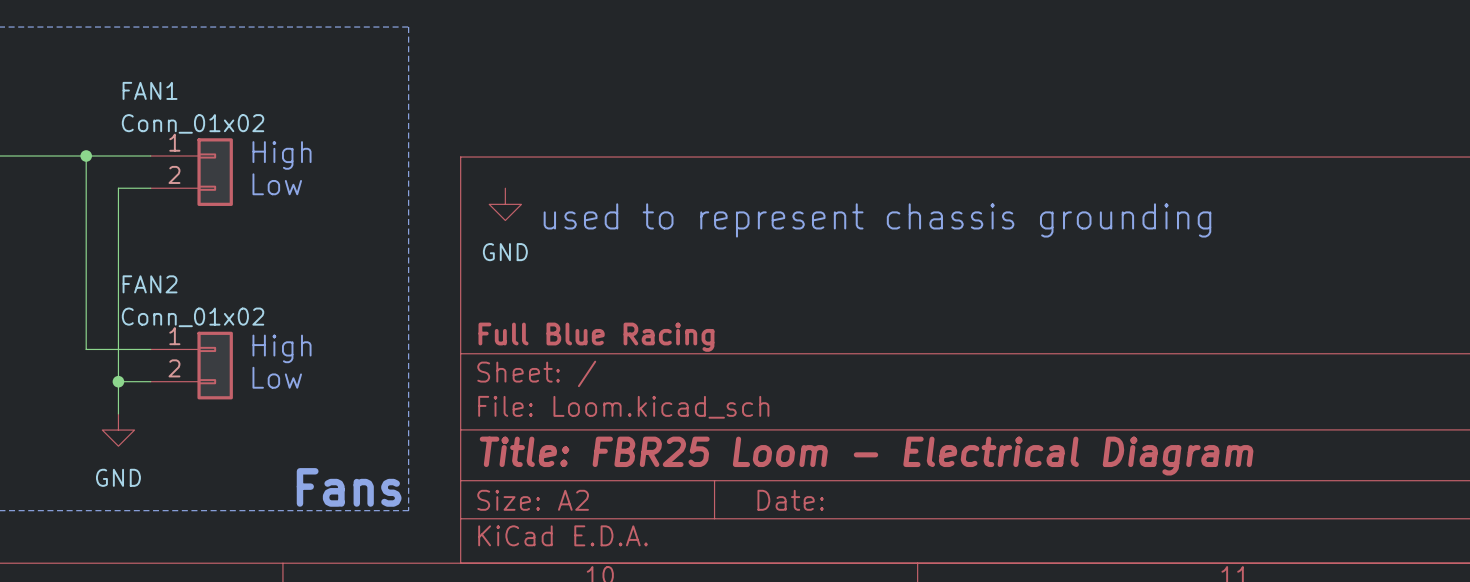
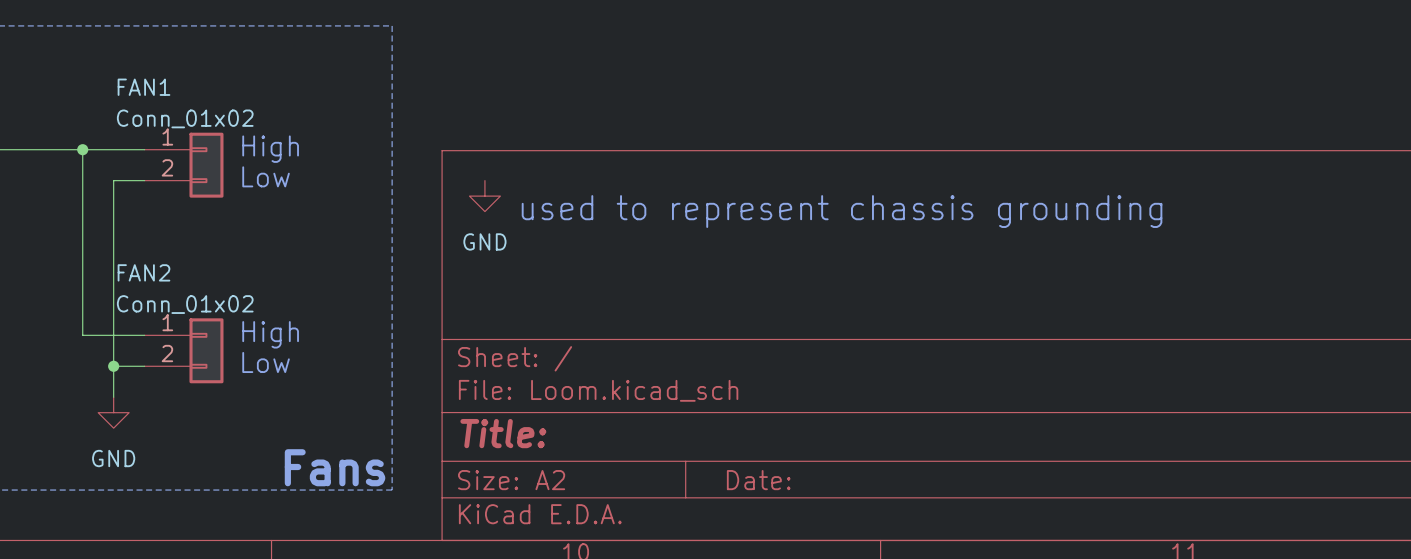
title block: Full Blue Racing (596, 337) -> none
title block: Title: FBR25 Loom - Electrical Diagram (866, 456) -> Title: (503, 433)

